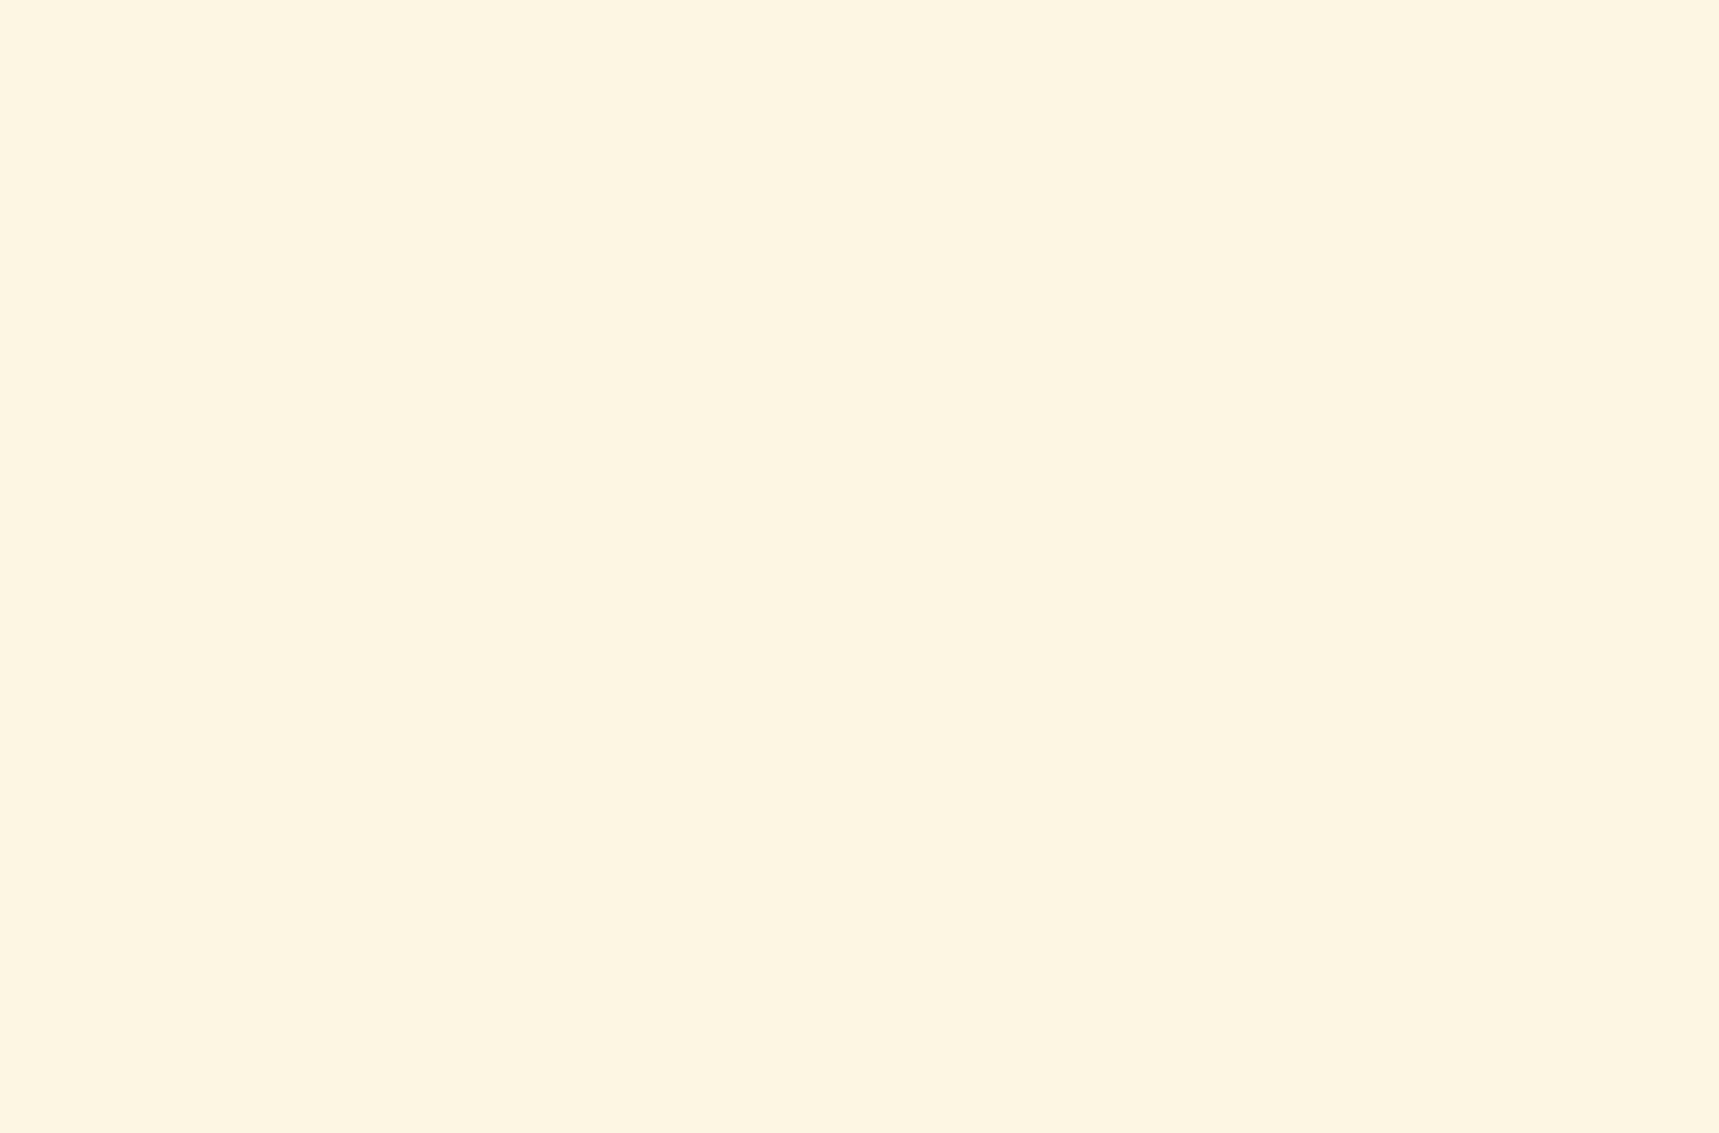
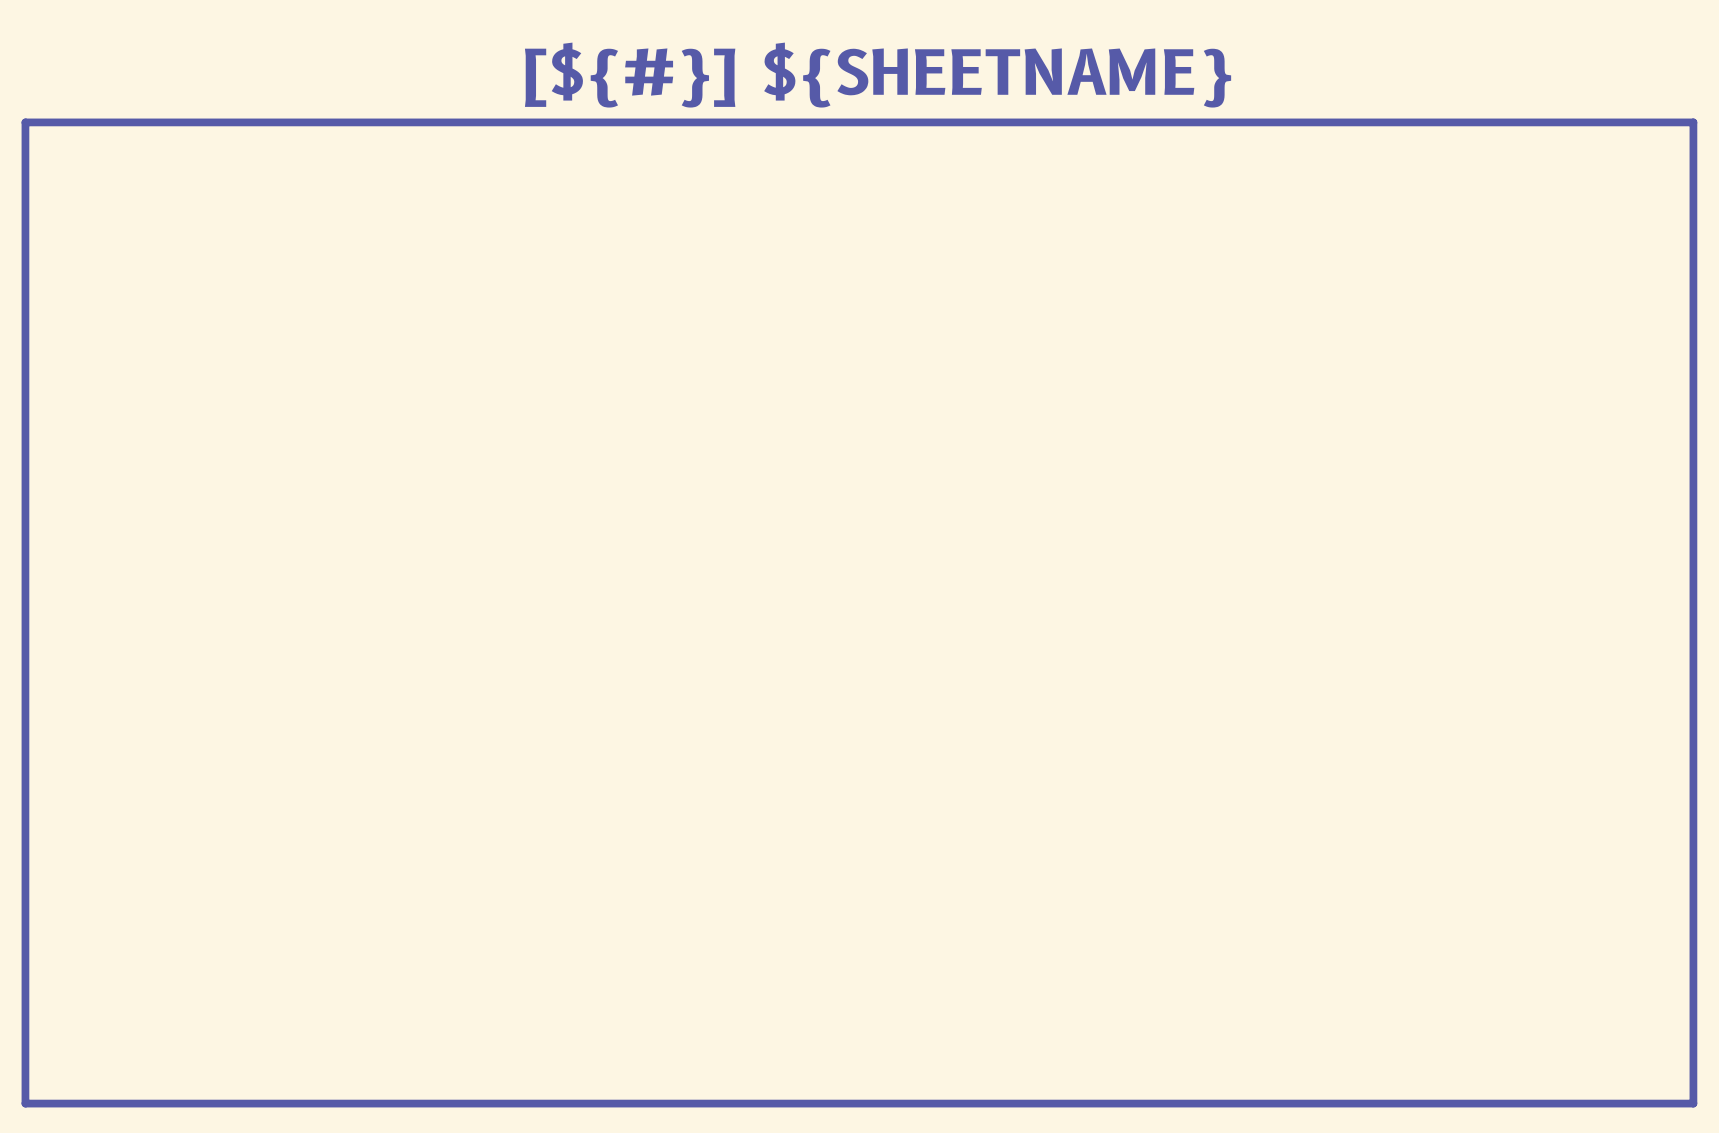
text: none -> [${#}] ${SHEETNAME} (878, 75)
line: none -> (25, 122) (1693, 122) (1693, 1103) (25, 1103) (25, 122)

